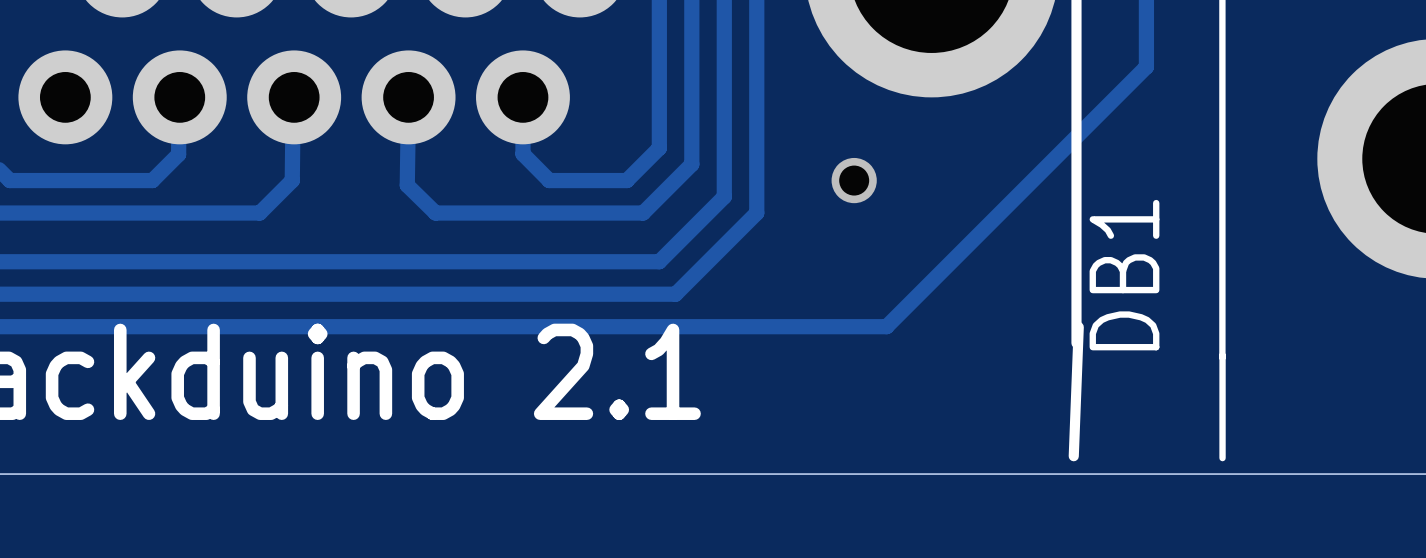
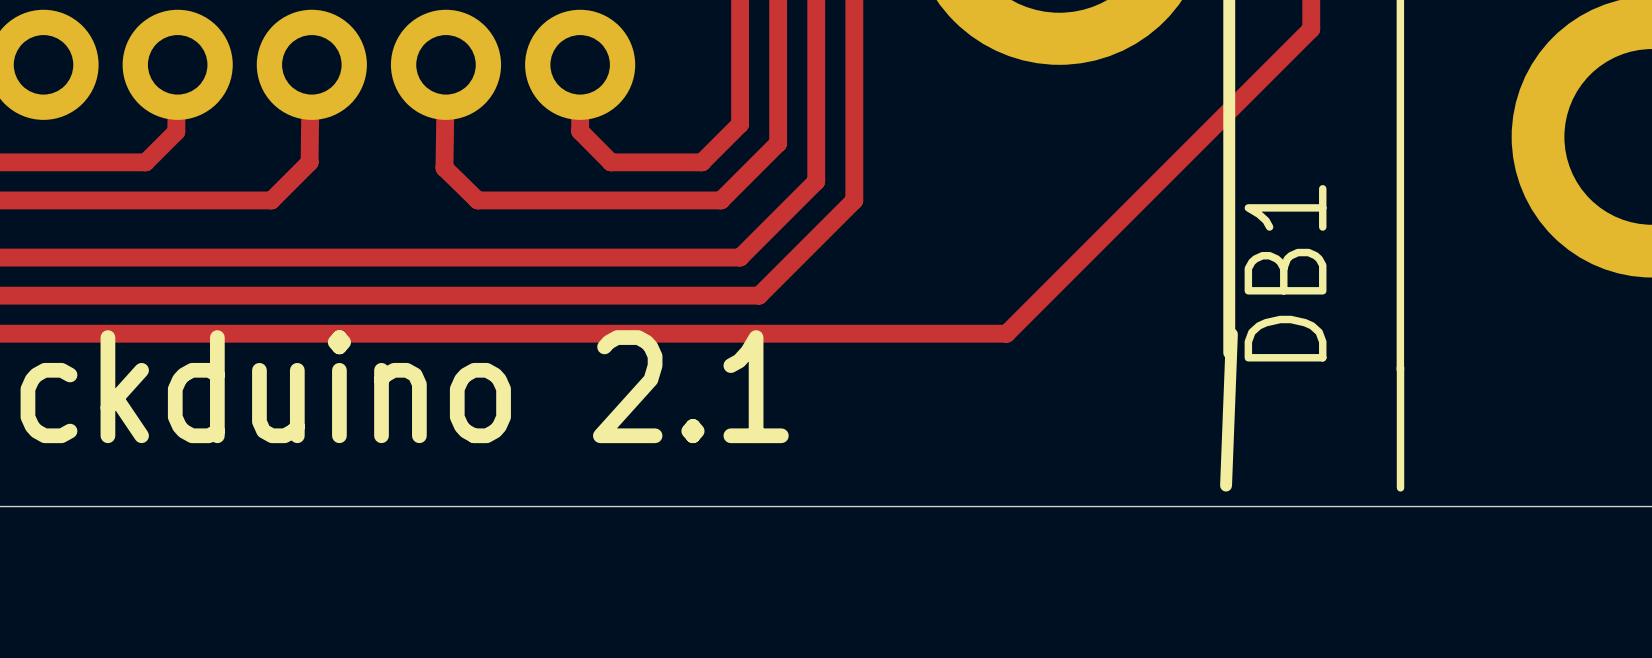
via: (854, 180) -> none

